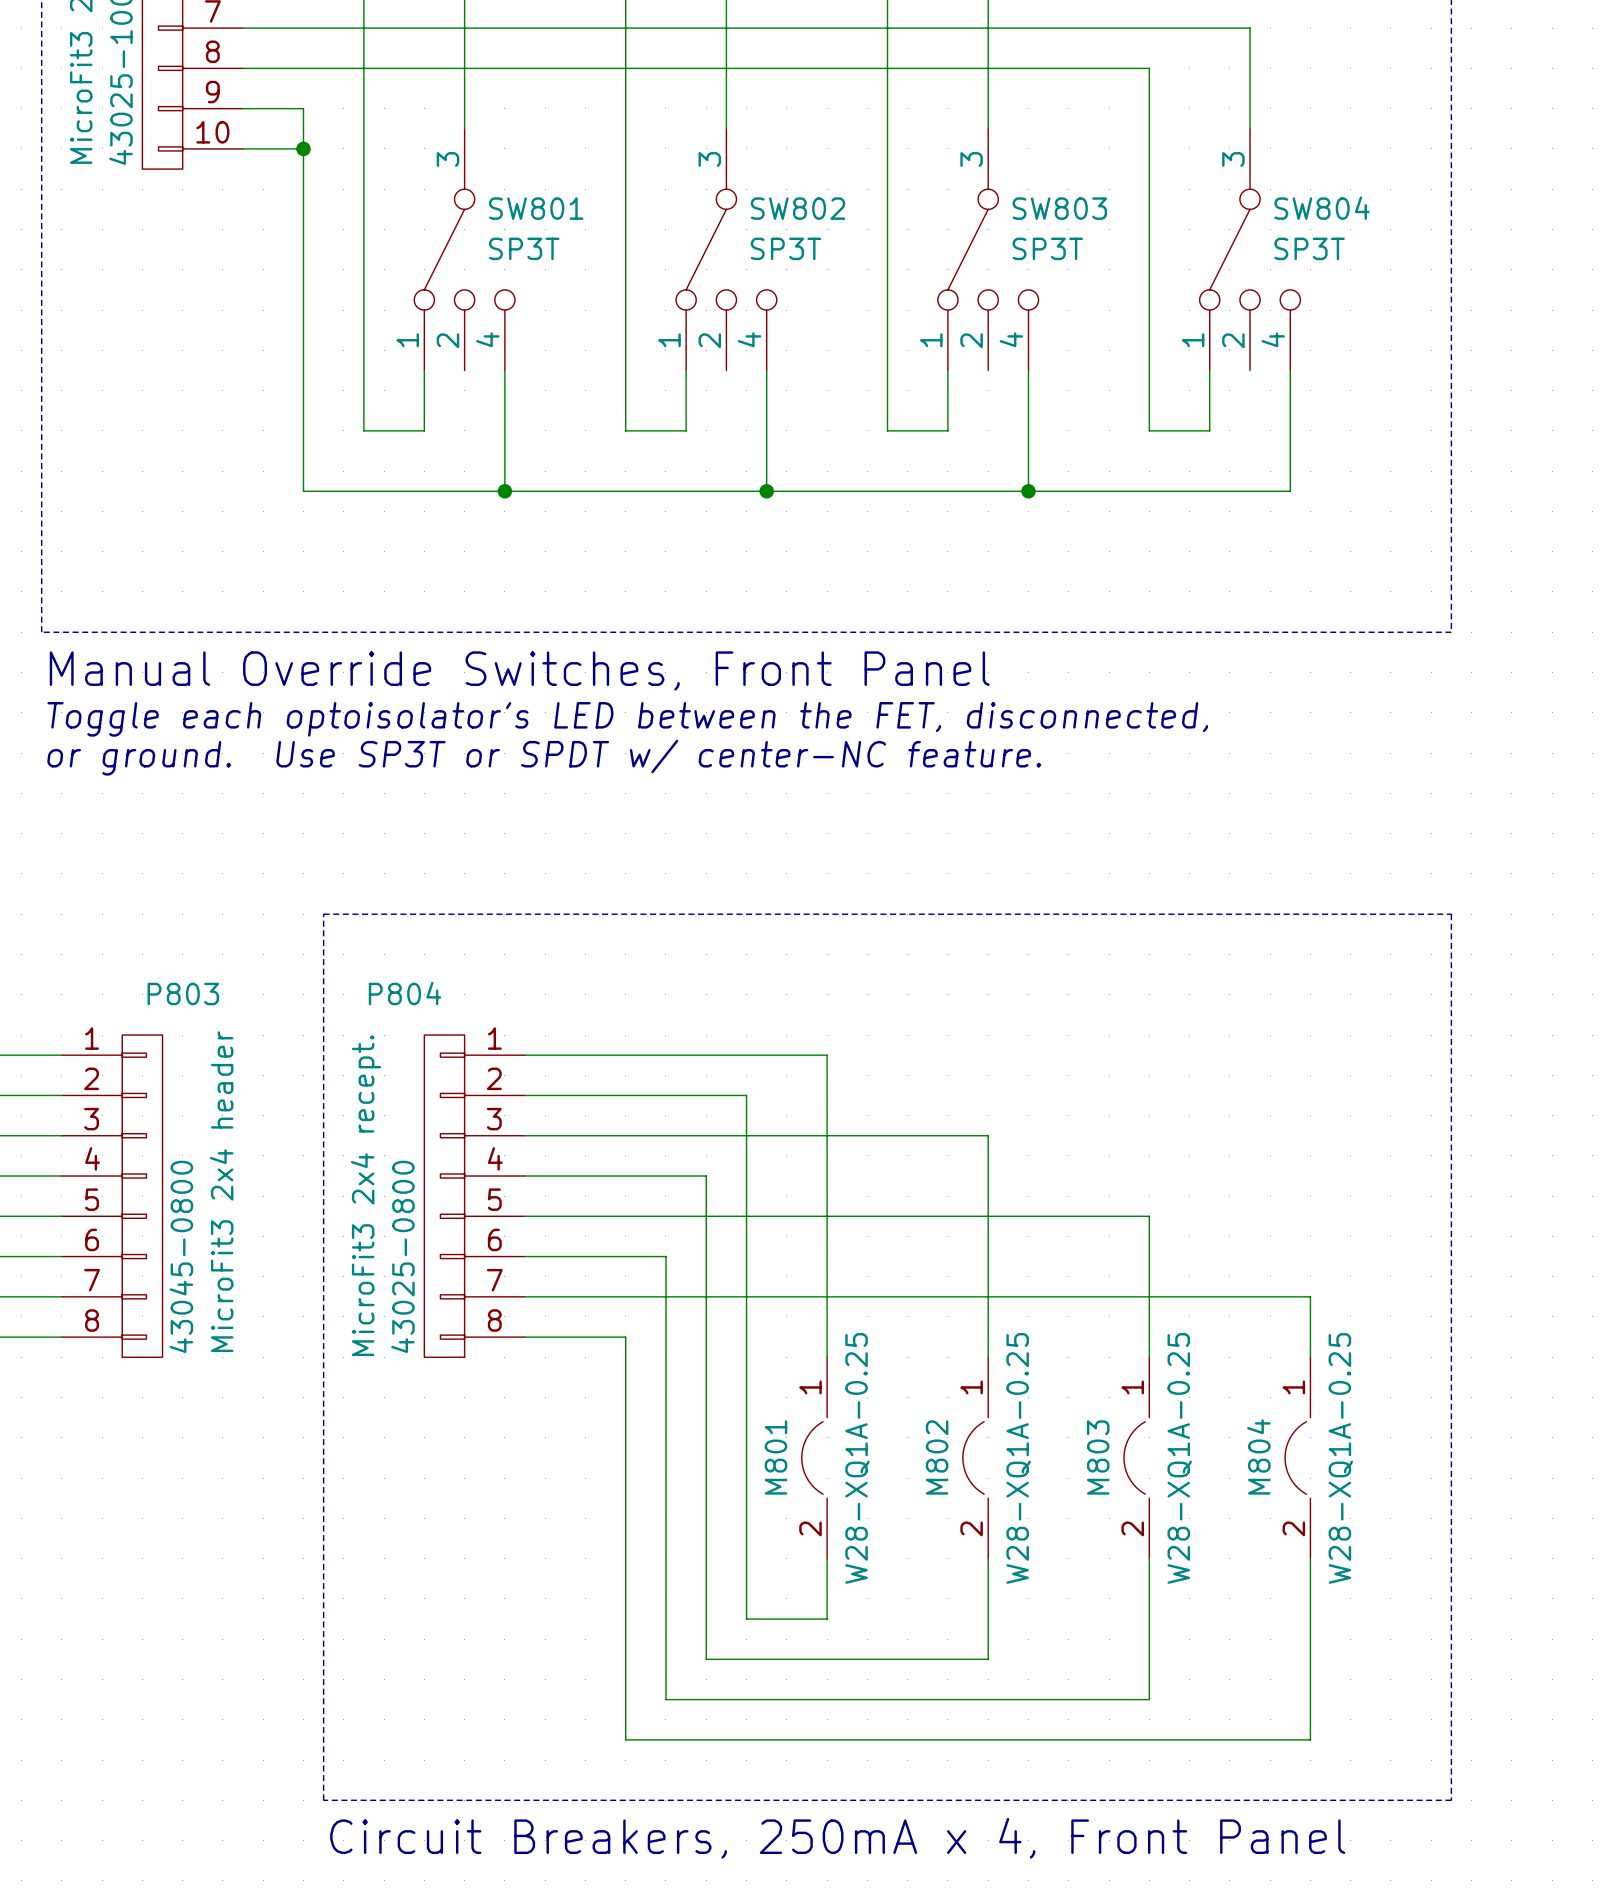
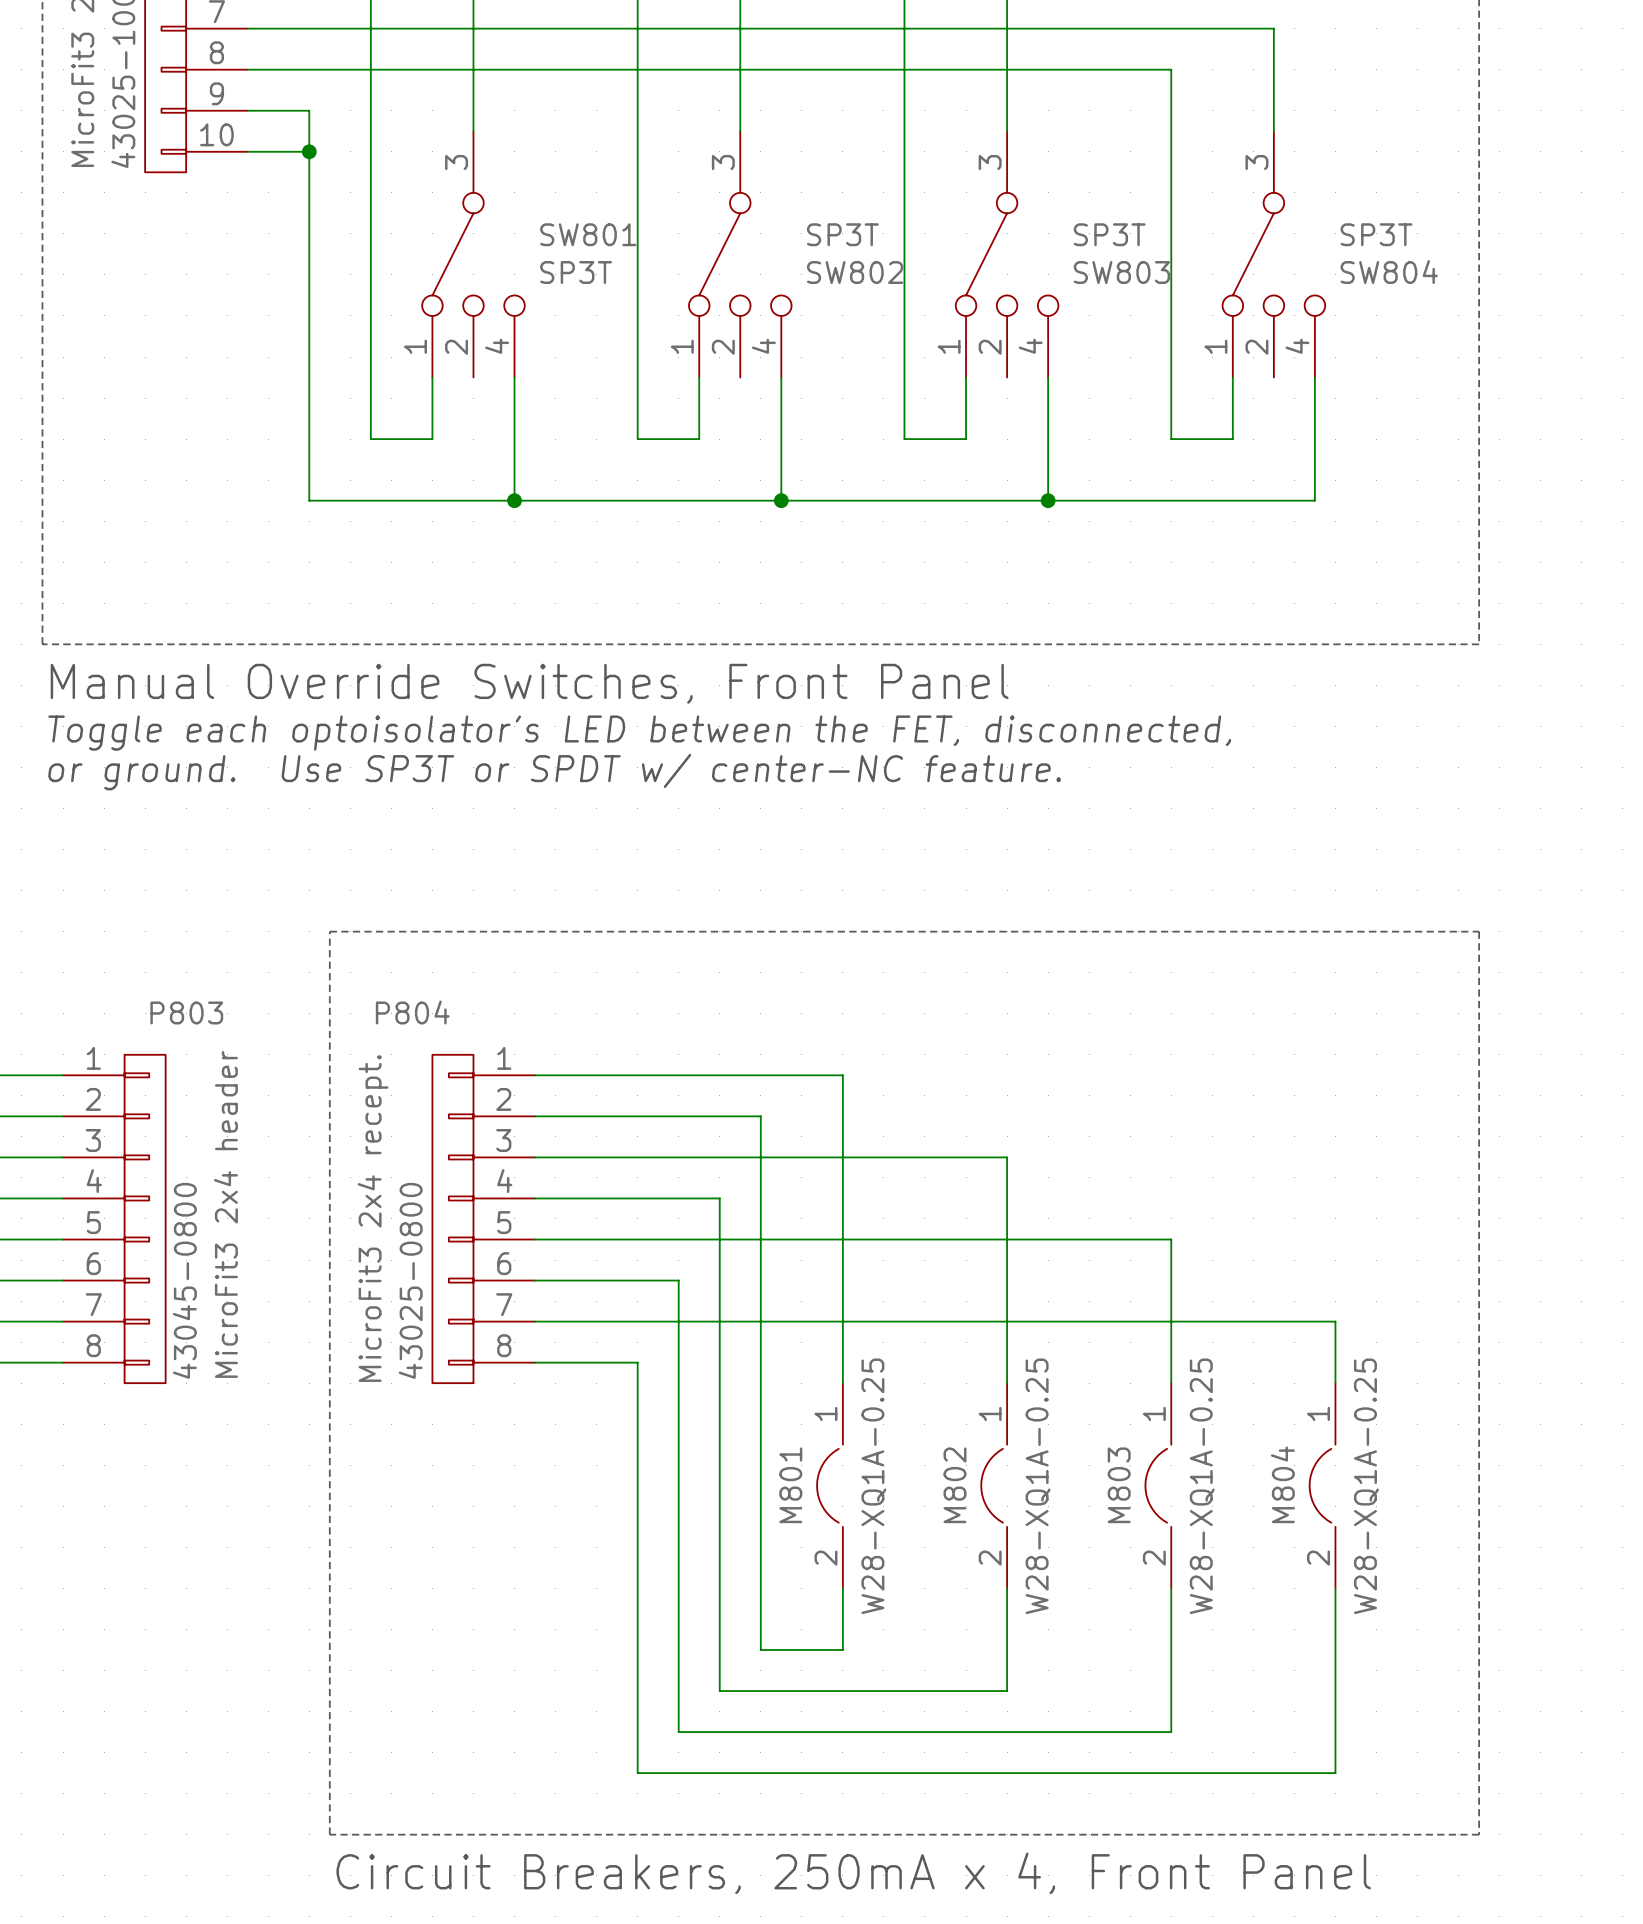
SW801 name position: SW801 (536, 208) -> SW801 (588, 234)
SW802 name position: SW802 (798, 208) -> SW802 (855, 272)
SW803 name position: SW803 (1059, 208) -> SW803 (1121, 272)
SW804 name position: SW804 (1322, 208) -> SW804 (1389, 272)
SW801 value position: SP3T (524, 248) -> SP3T (576, 272)
SW802 value position: SP3T (786, 248) -> SP3T (842, 234)
SW803 value position: SP3T (1047, 248) -> SP3T (1109, 234)
SW804 value position: SP3T (1309, 248) -> SP3T (1376, 234)

